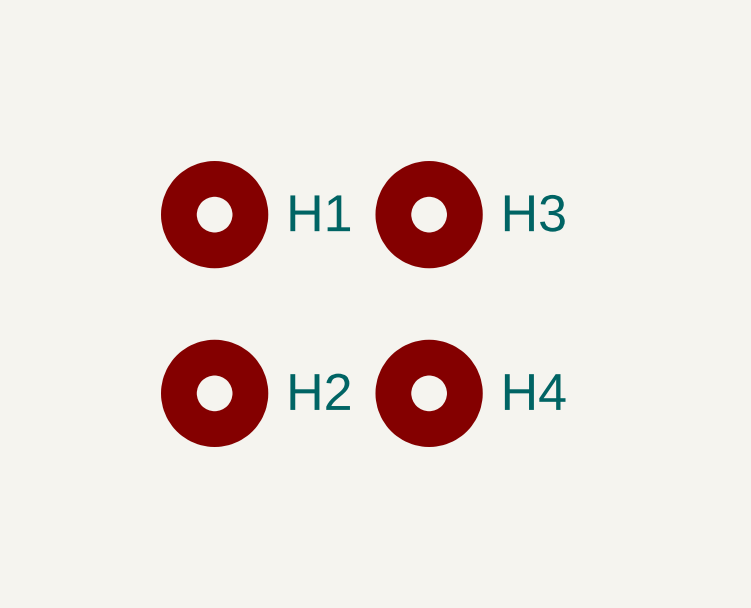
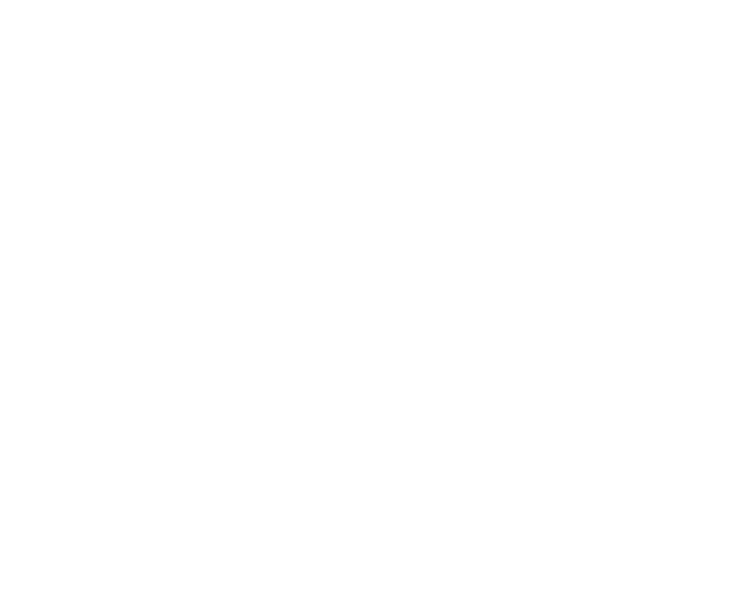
H1: (214, 214) -> none
H3: (429, 214) -> none
H2: (214, 393) -> none
H4: (429, 393) -> none

